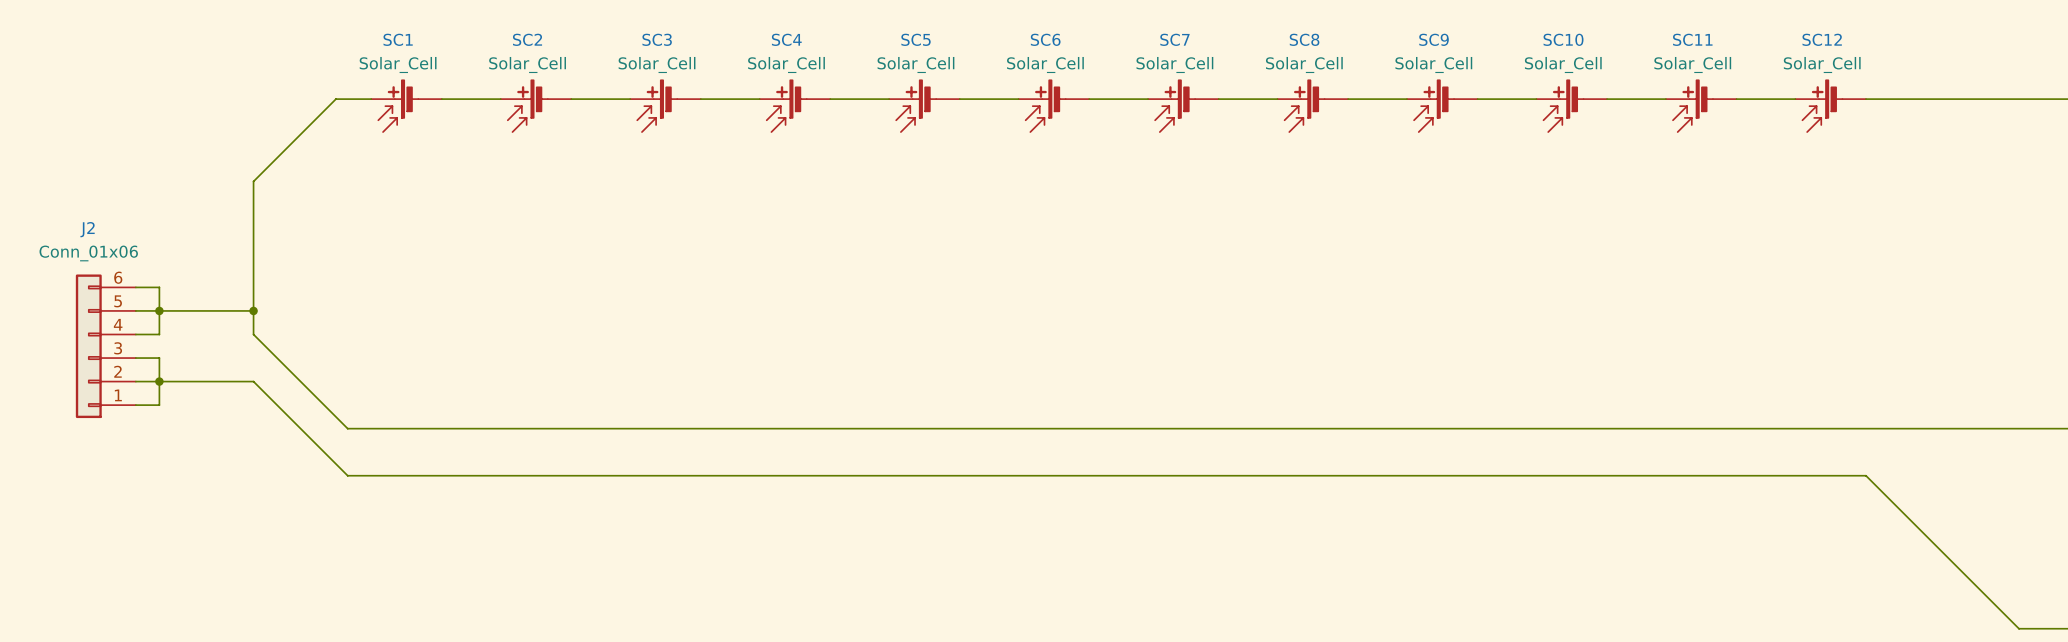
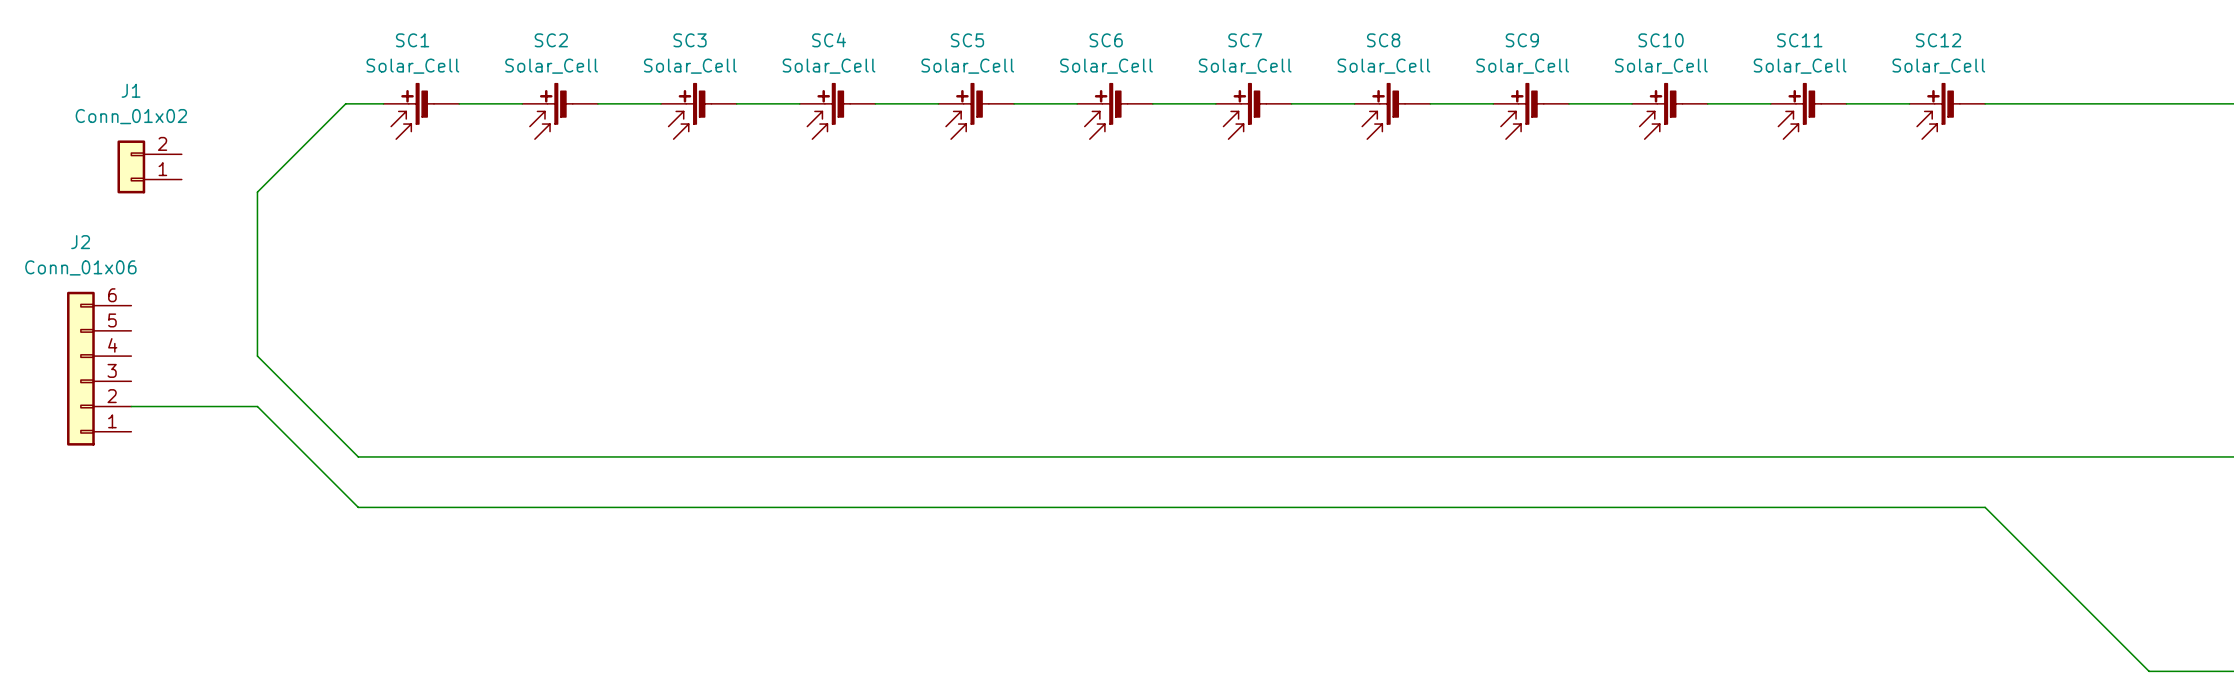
J1: none -> Conn_01x02 (149, 166)
wire: (135, 287) (159, 287) (159, 334) (135, 334) -> none
wire: (135, 310) (253, 310) -> none
junction: (159, 310) -> none
junction: (253, 310) -> none
wire: (135, 358) (159, 358) (159, 405) (135, 405) -> none
junction: (159, 381) -> none

